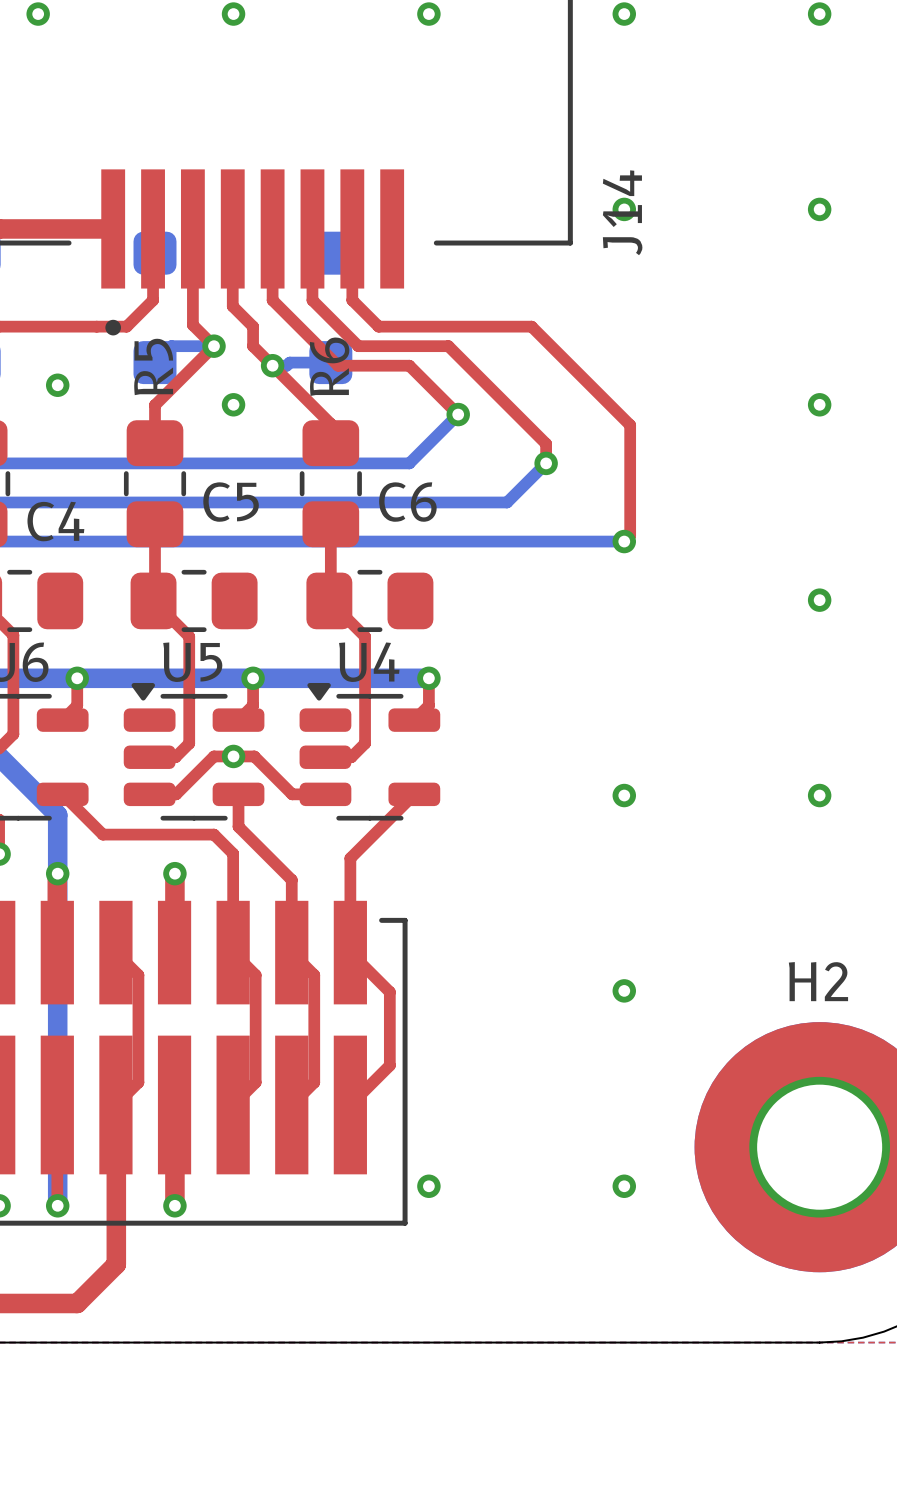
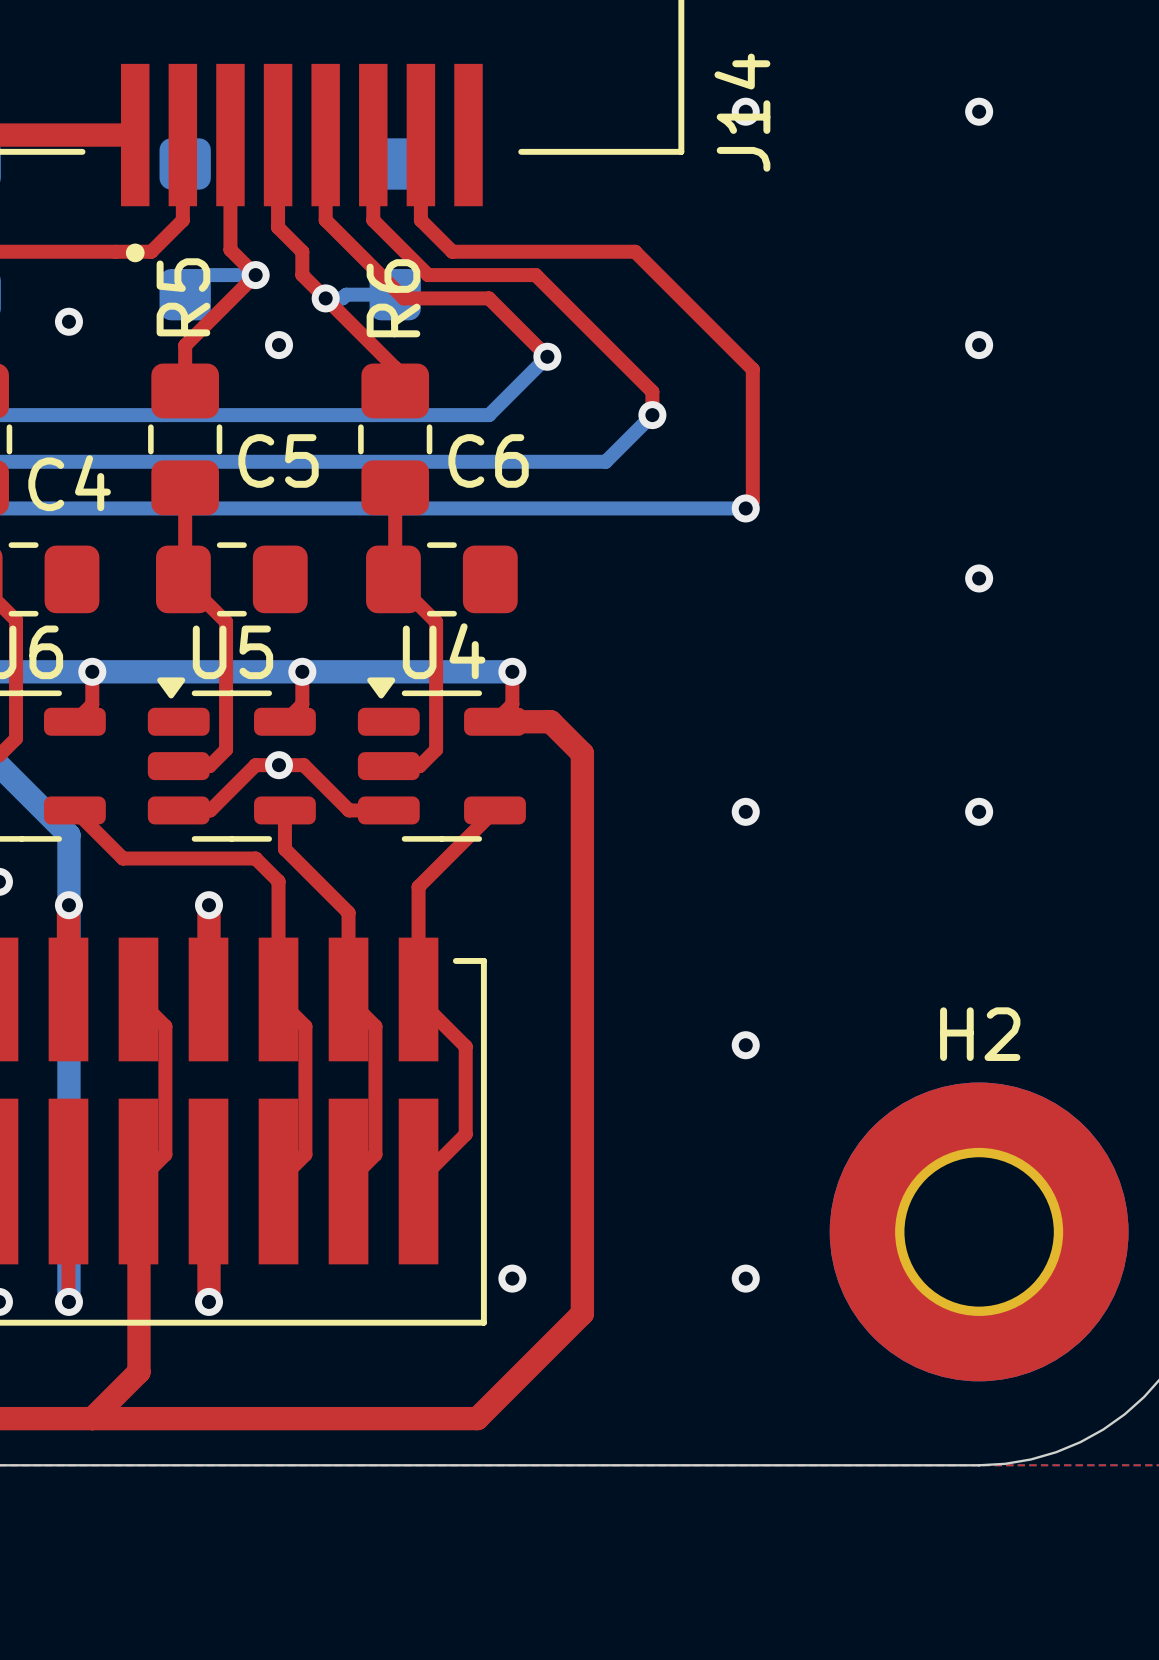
top track: none -> (494, 721) (550, 721) (582, 753) (582, 1313) (477, 1418) (92, 1418)

